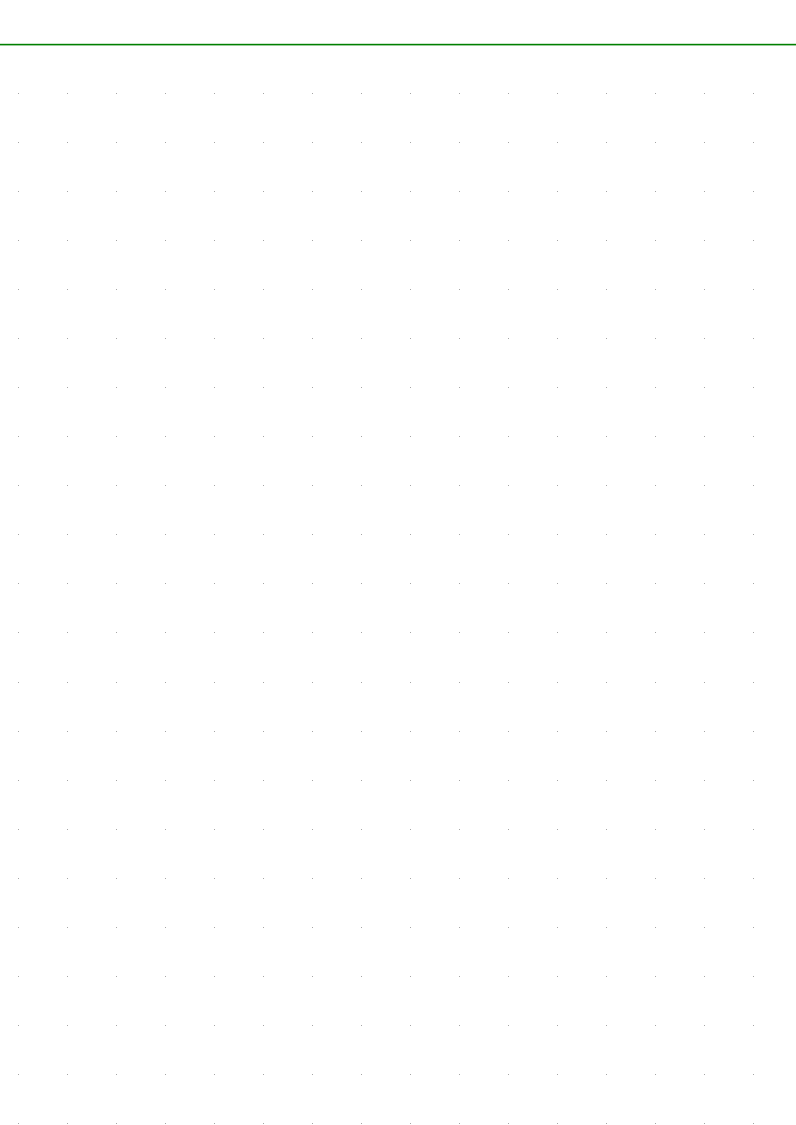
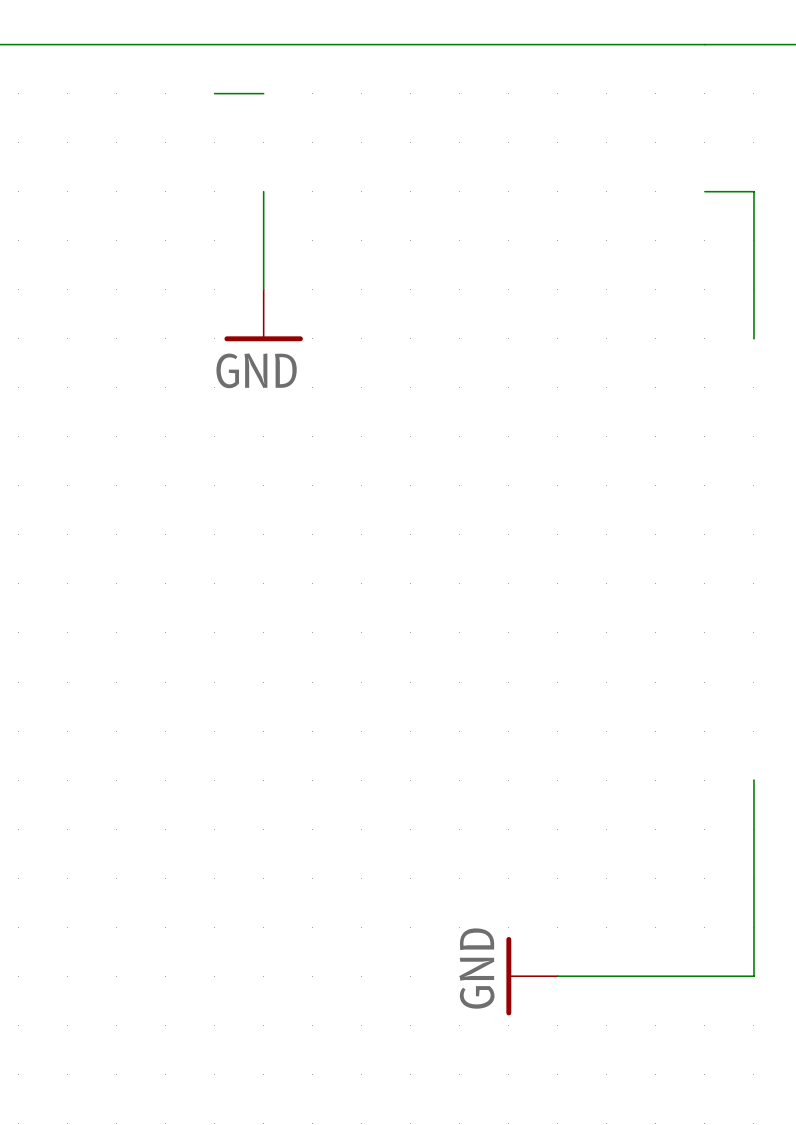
wire: none -> (214, 93) (263, 93)
wire: none -> (263, 191) (263, 289)
wire: none -> (704, 191) (753, 191) (753, 338)
power symbol: none -> GND (263, 315)
wire: none -> (753, 780) (753, 976) (557, 976)
power symbol: none -> GND (532, 976)

